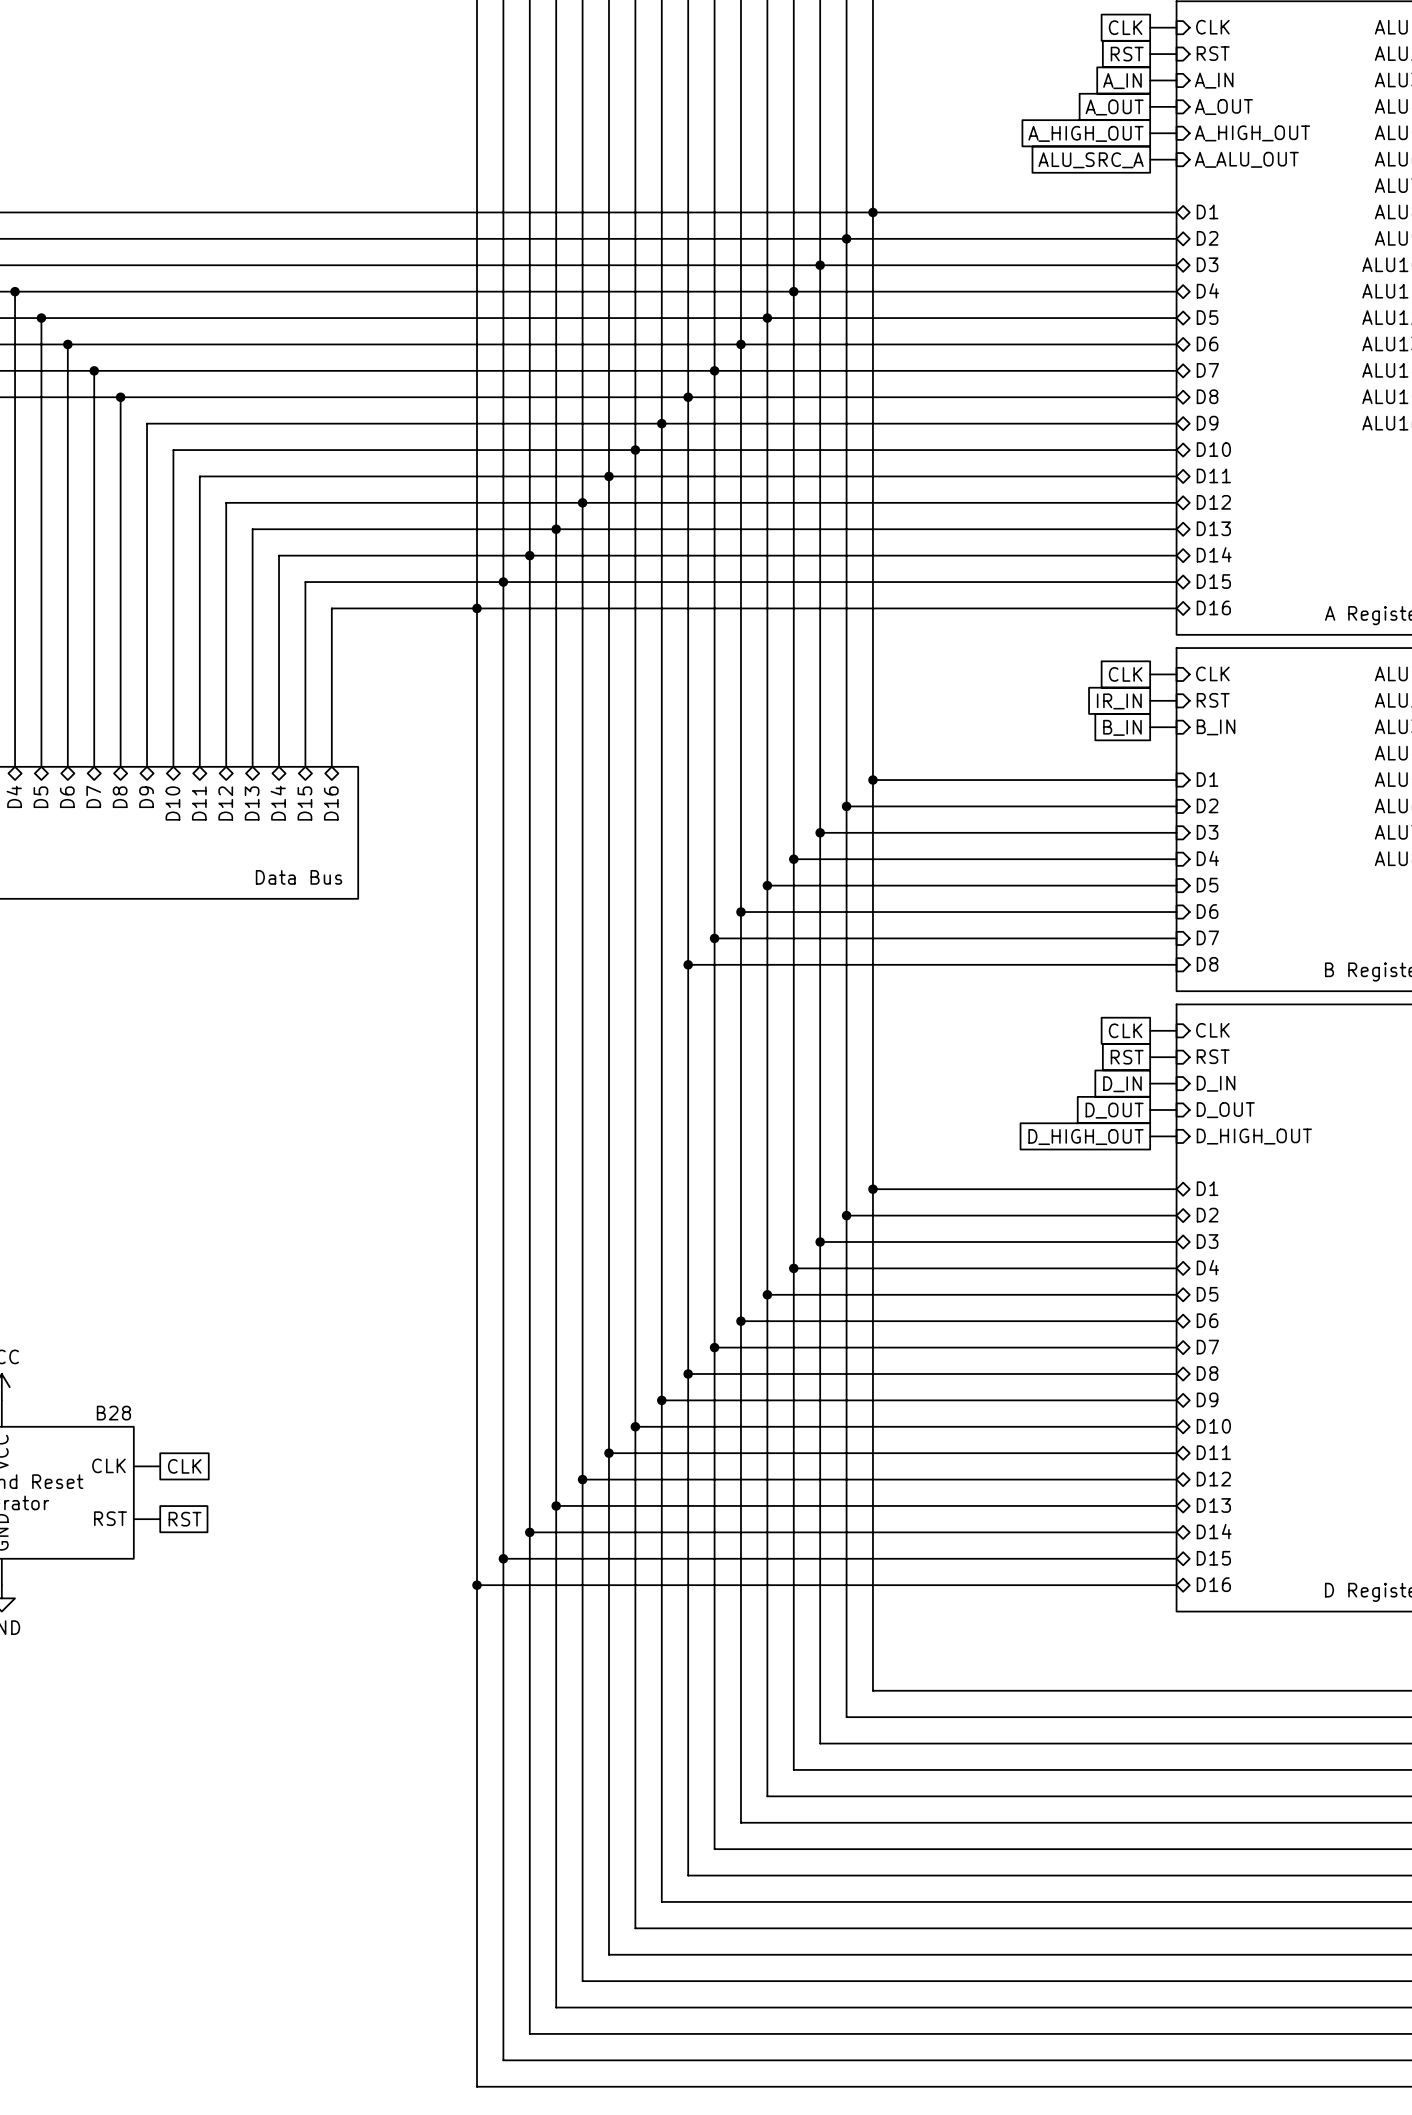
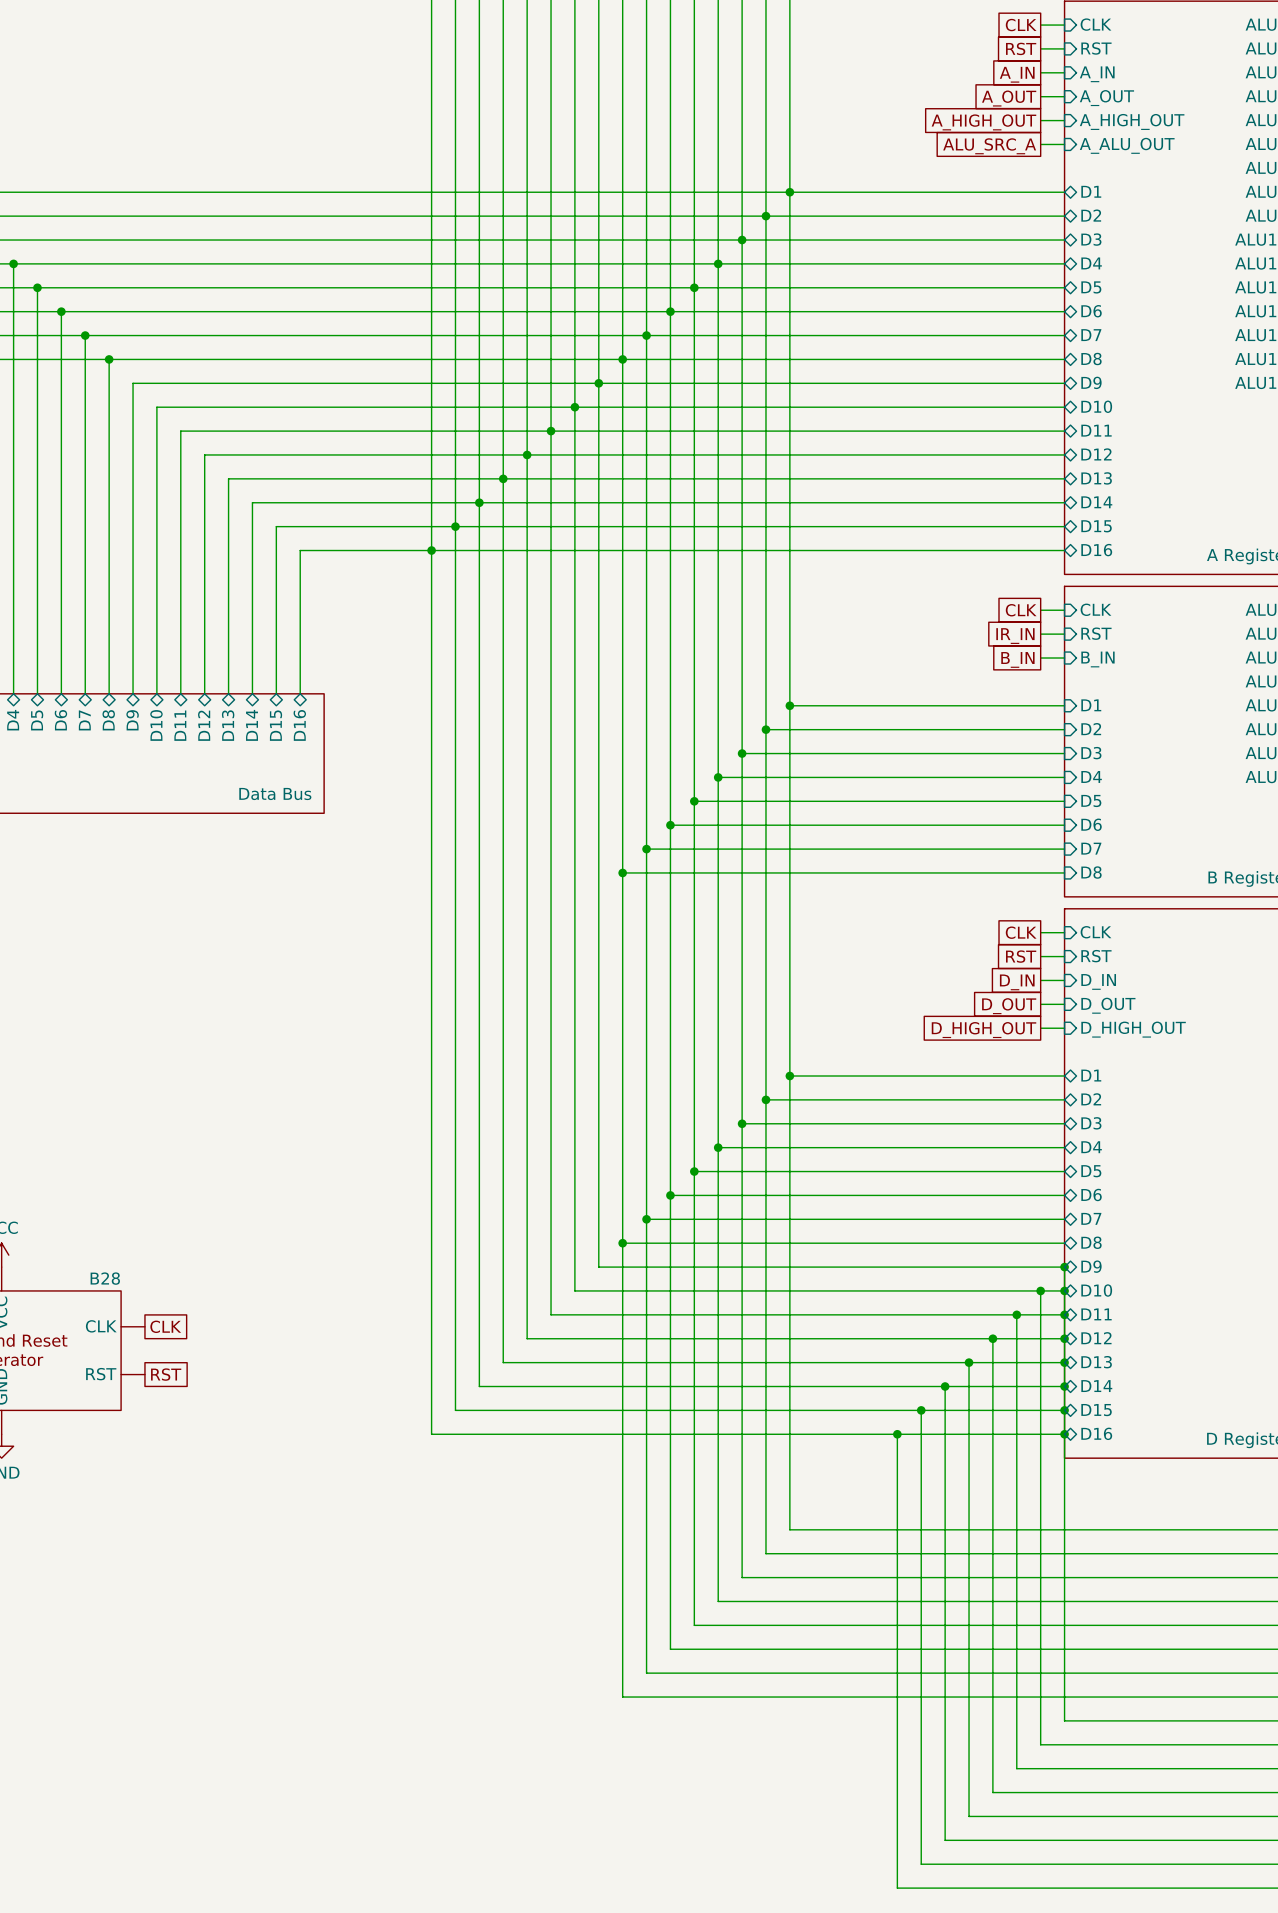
wire: (661, 1400) (661, 1901) (1176, 1901) -> (1064, 1267) (1064, 1720)
junction: (661, 1400) -> none
junction: none -> (1064, 1267)
wire: (635, 1426) (635, 1928) (1150, 1928) -> (1040, 1290) (1040, 1744)
junction: (635, 1426) -> none
junction: none -> (1040, 1290)
junction: none -> (1064, 1290)
wire: (608, 1453) (608, 1954) (1123, 1954) -> (1016, 1314) (1016, 1768)
junction: (608, 1453) -> none
junction: none -> (1016, 1314)
junction: none -> (1064, 1314)
wire: (582, 1479) (582, 1981) (1097, 1981) -> (992, 1338) (992, 1792)
junction: (582, 1479) -> none
junction: none -> (992, 1338)
junction: none -> (1064, 1338)
wire: (556, 1505) (556, 2007) (1070, 2007) -> (969, 1362) (969, 1816)
junction: (556, 1505) -> none
junction: none -> (969, 1362)
junction: none -> (1064, 1362)
wire: (529, 1532) (529, 2033) (1044, 2033) -> (945, 1386) (945, 1840)
junction: (529, 1532) -> none
junction: none -> (945, 1386)
junction: none -> (1064, 1386)
wire: (503, 1558) (503, 2060) (1018, 2060) -> (921, 1410) (921, 1864)
junction: (503, 1558) -> none
junction: none -> (921, 1410)
junction: none -> (1064, 1410)
wire: (477, 1585) (477, 2086) (991, 2086) -> (897, 1434) (897, 1888)
junction: (477, 1585) -> none
junction: none -> (897, 1434)
junction: none -> (1064, 1434)

